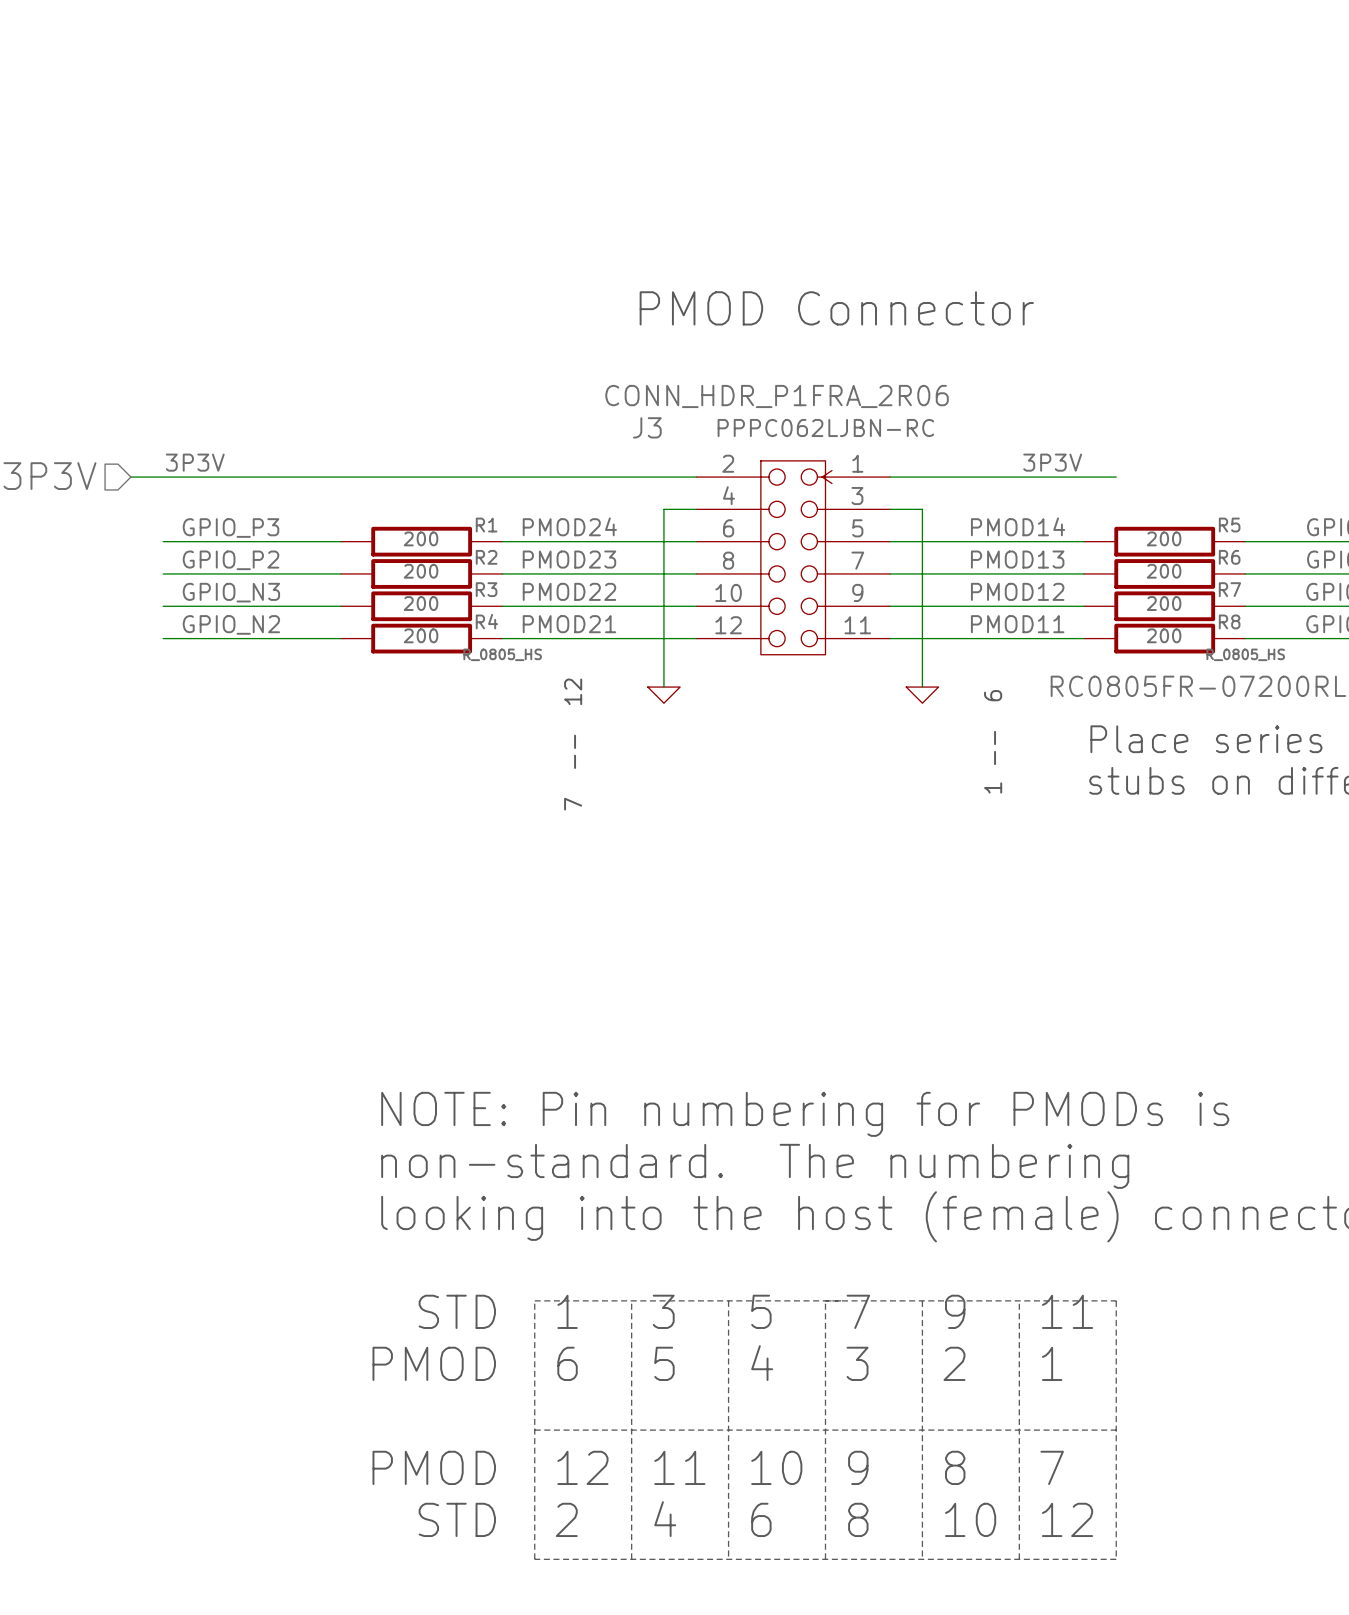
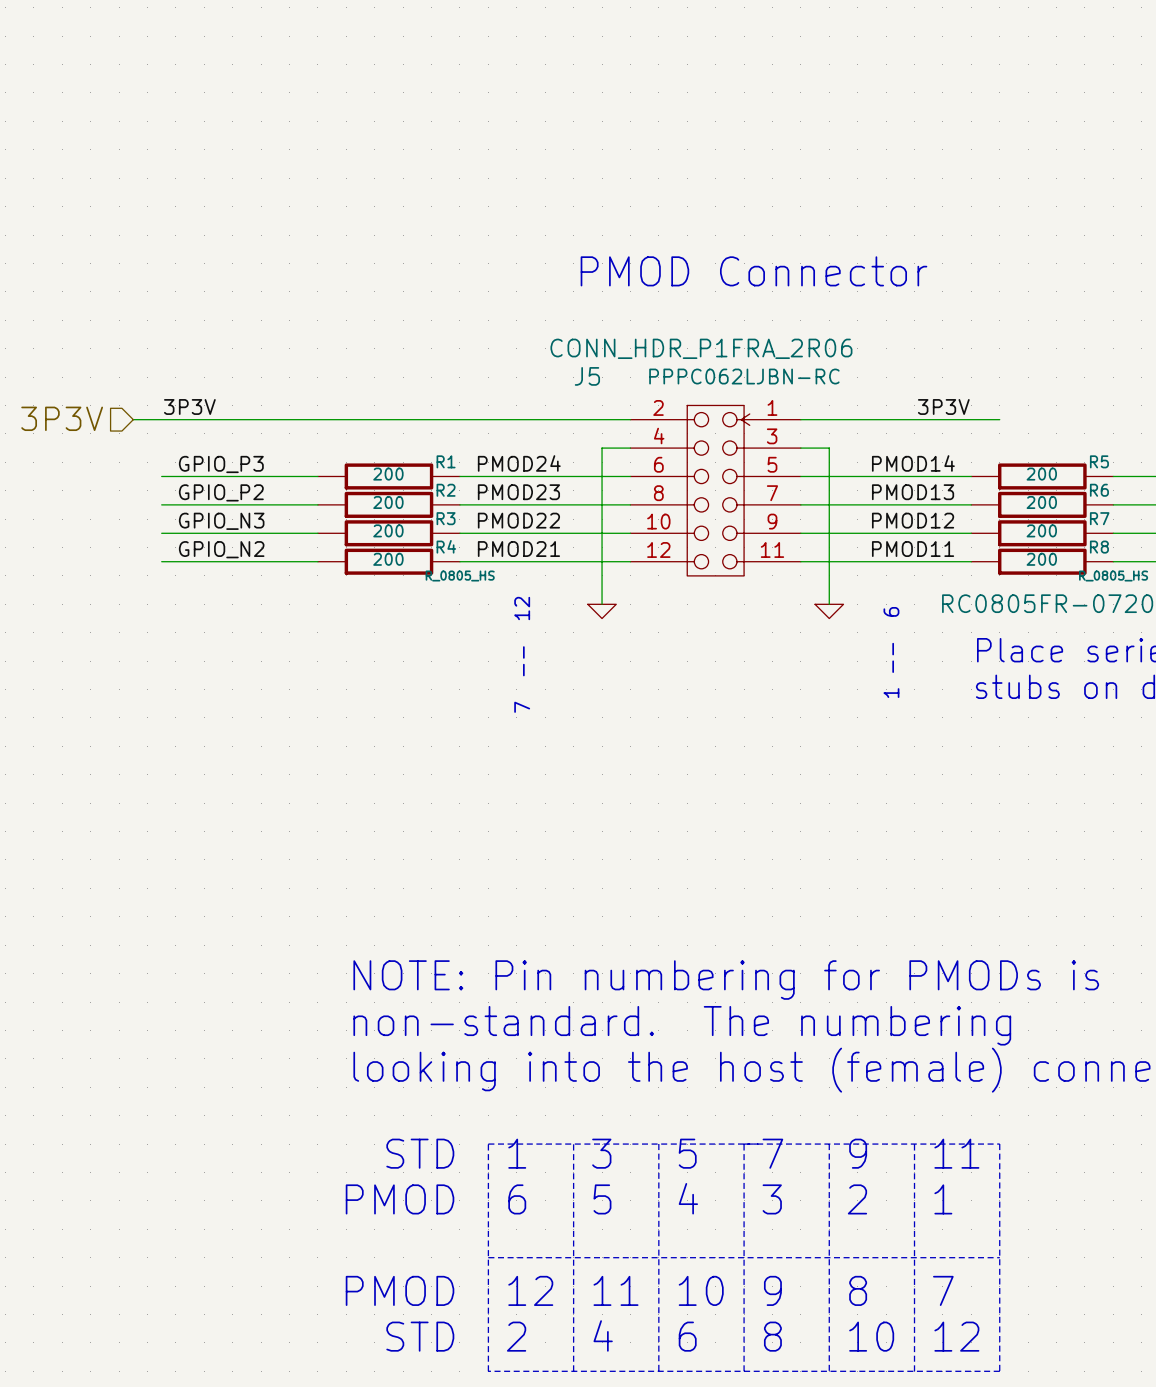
J3 name: J3 (647, 427) -> J5 (587, 376)

